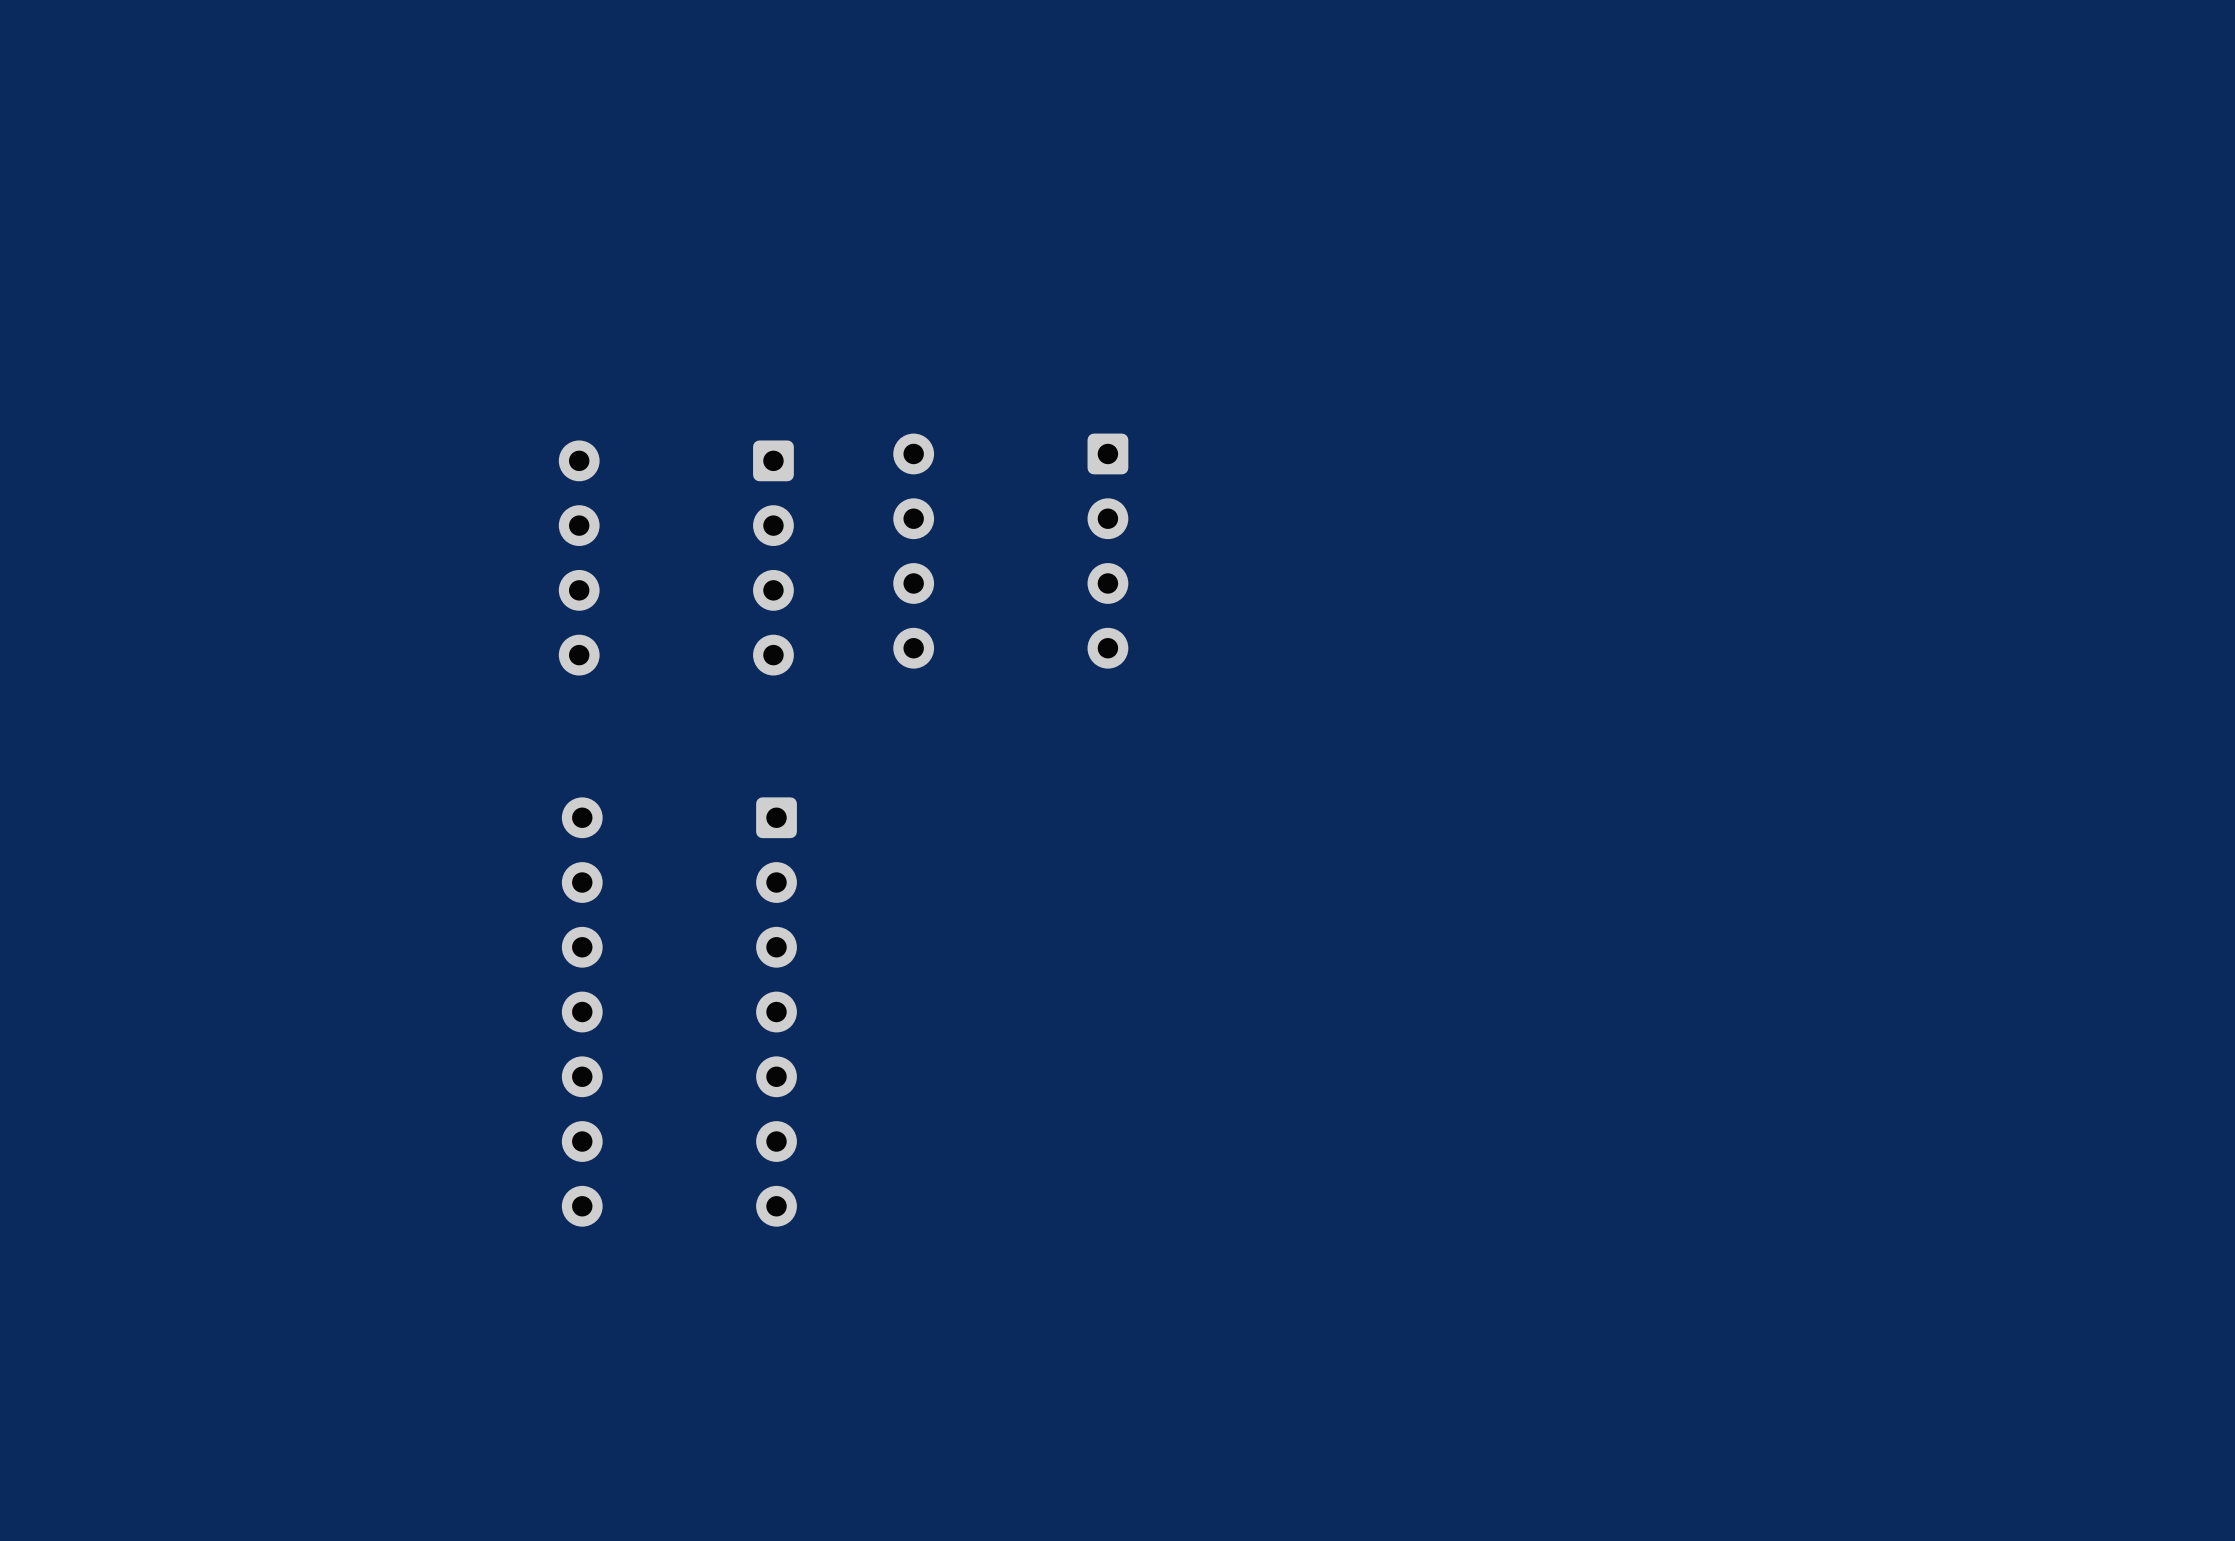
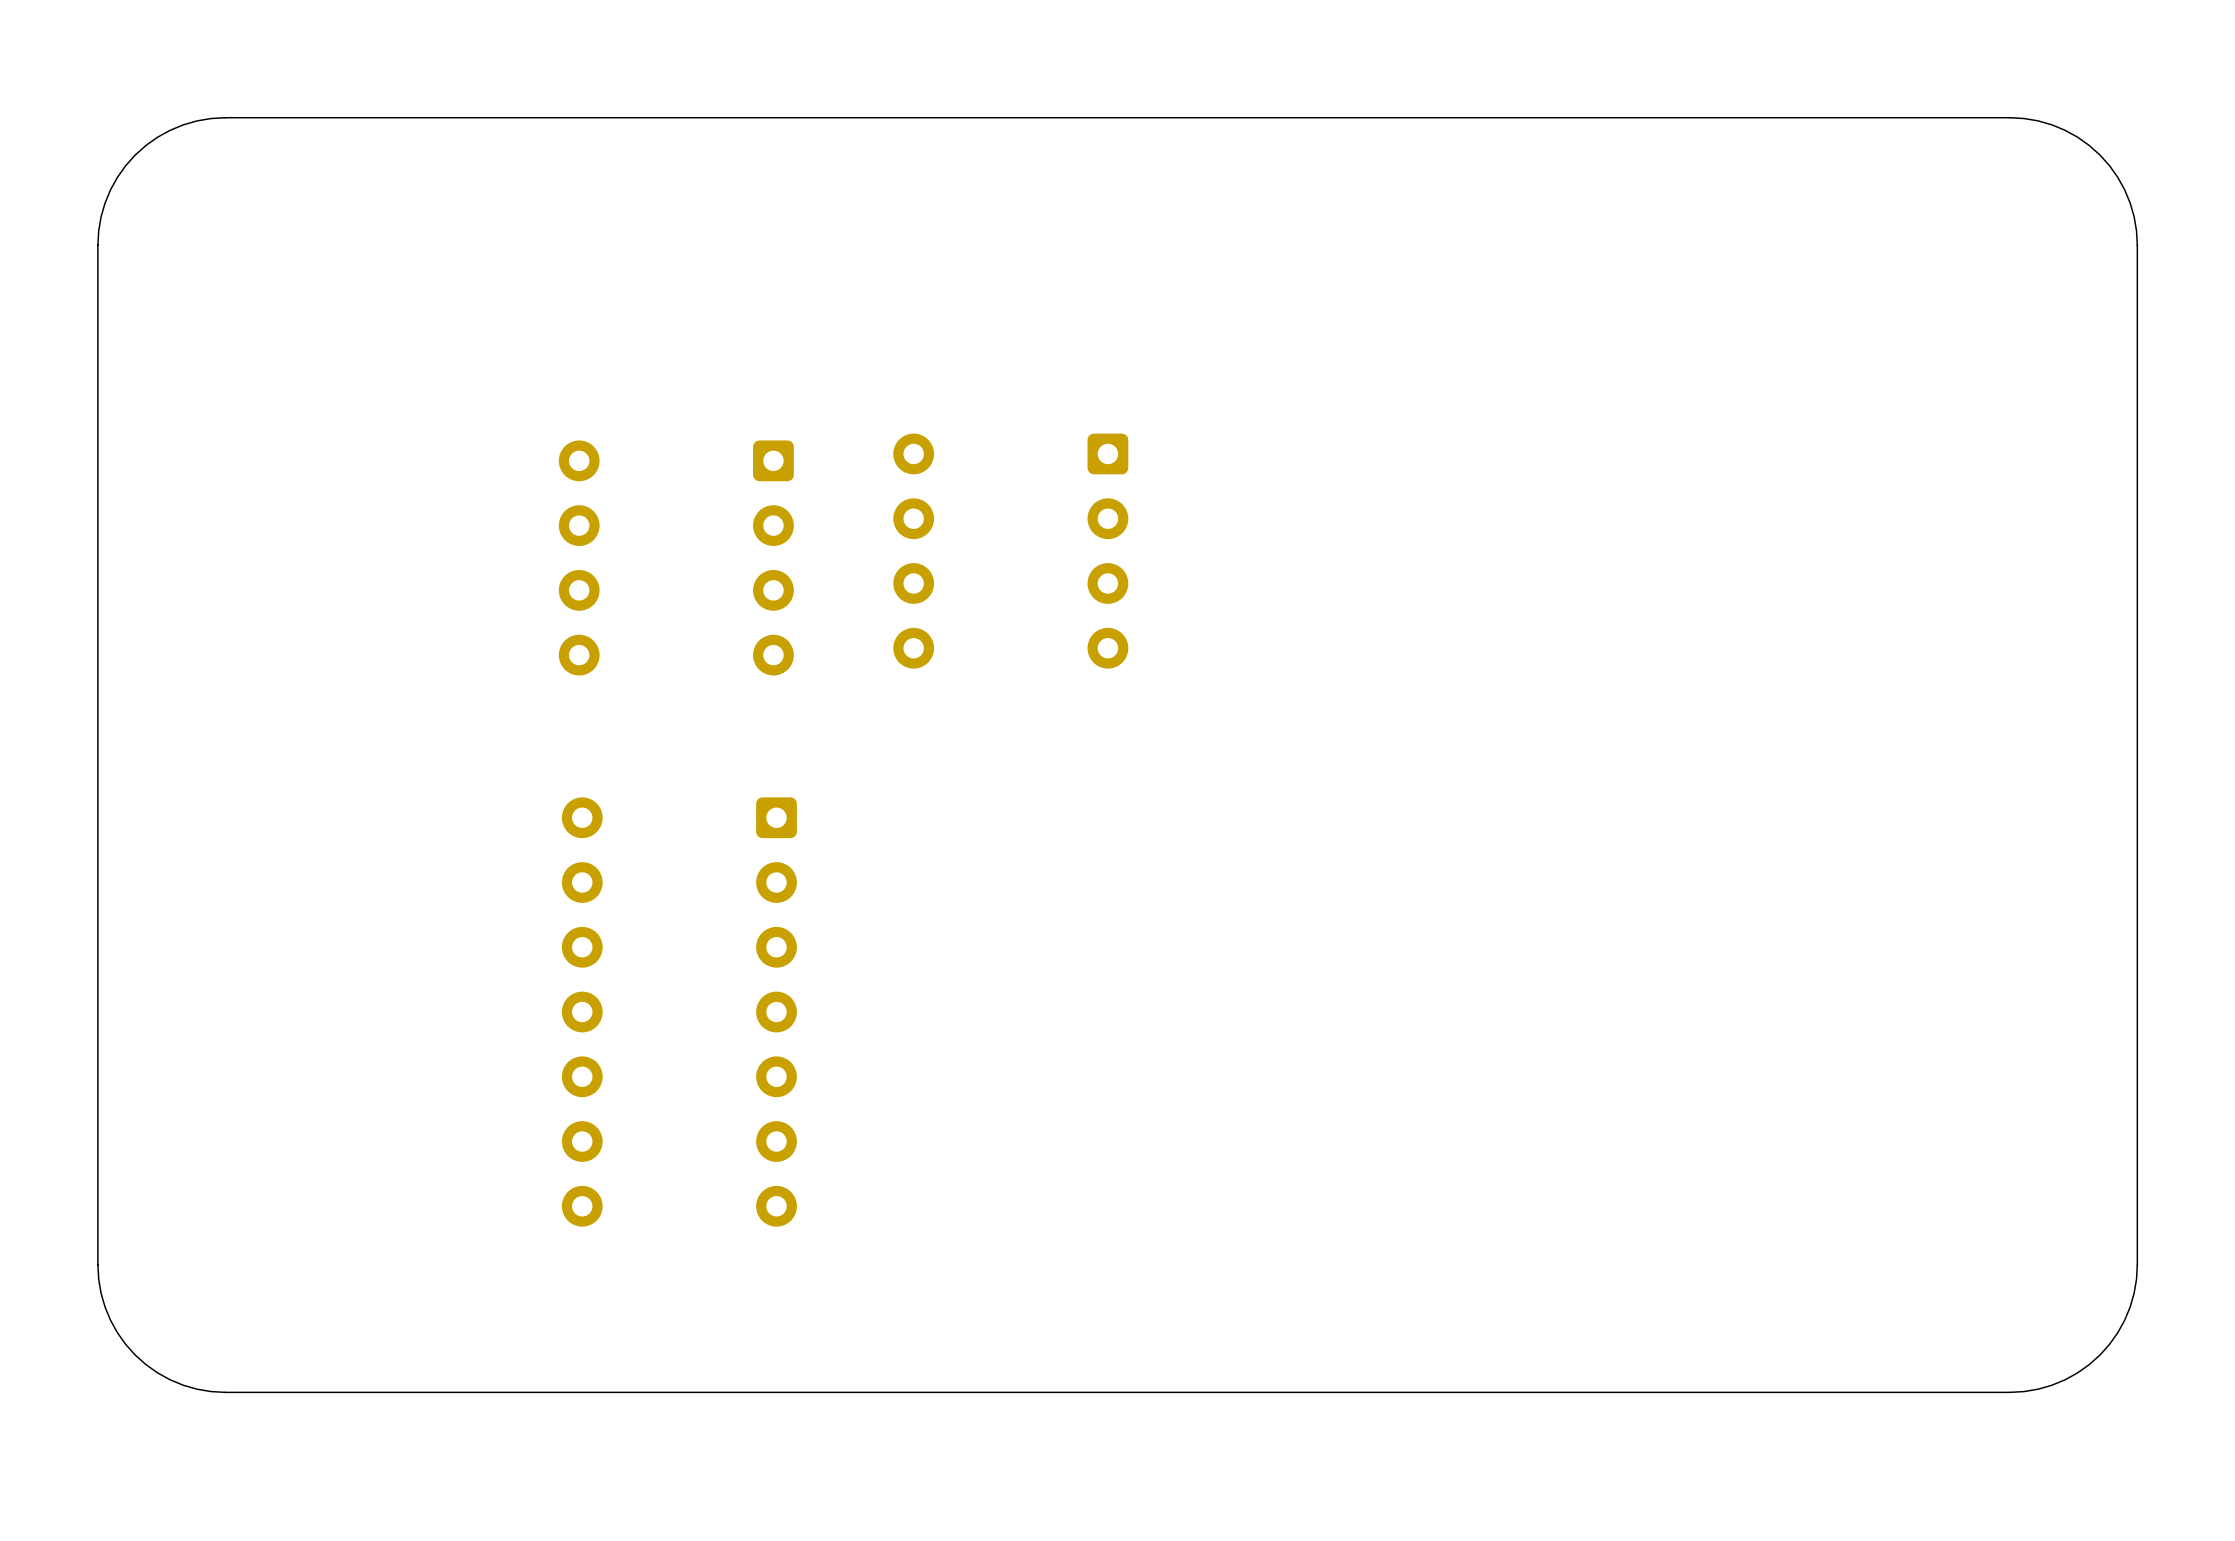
board edge: none -> (2009, 117) (225, 117) (196, 120) (170, 130) (157, 137) (135, 155) (117, 177) (105, 203) (101, 216) (97, 245) (97, 1264) (101, 1293) (105, 1307) (117, 1332) (125, 1344) (145, 1364) (170, 1379) (196, 1389) (225, 1392) (2009, 1392) (2038, 1389) (2065, 1379) (2077, 1372) (2100, 1355) (2117, 1332) (2124, 1320) (2134, 1293) (2137, 1264) (2137, 245) (2134, 216) (2124, 189) (2109, 165) (2100, 155) (2077, 137) (2065, 130) (2038, 120) (2009, 117)

